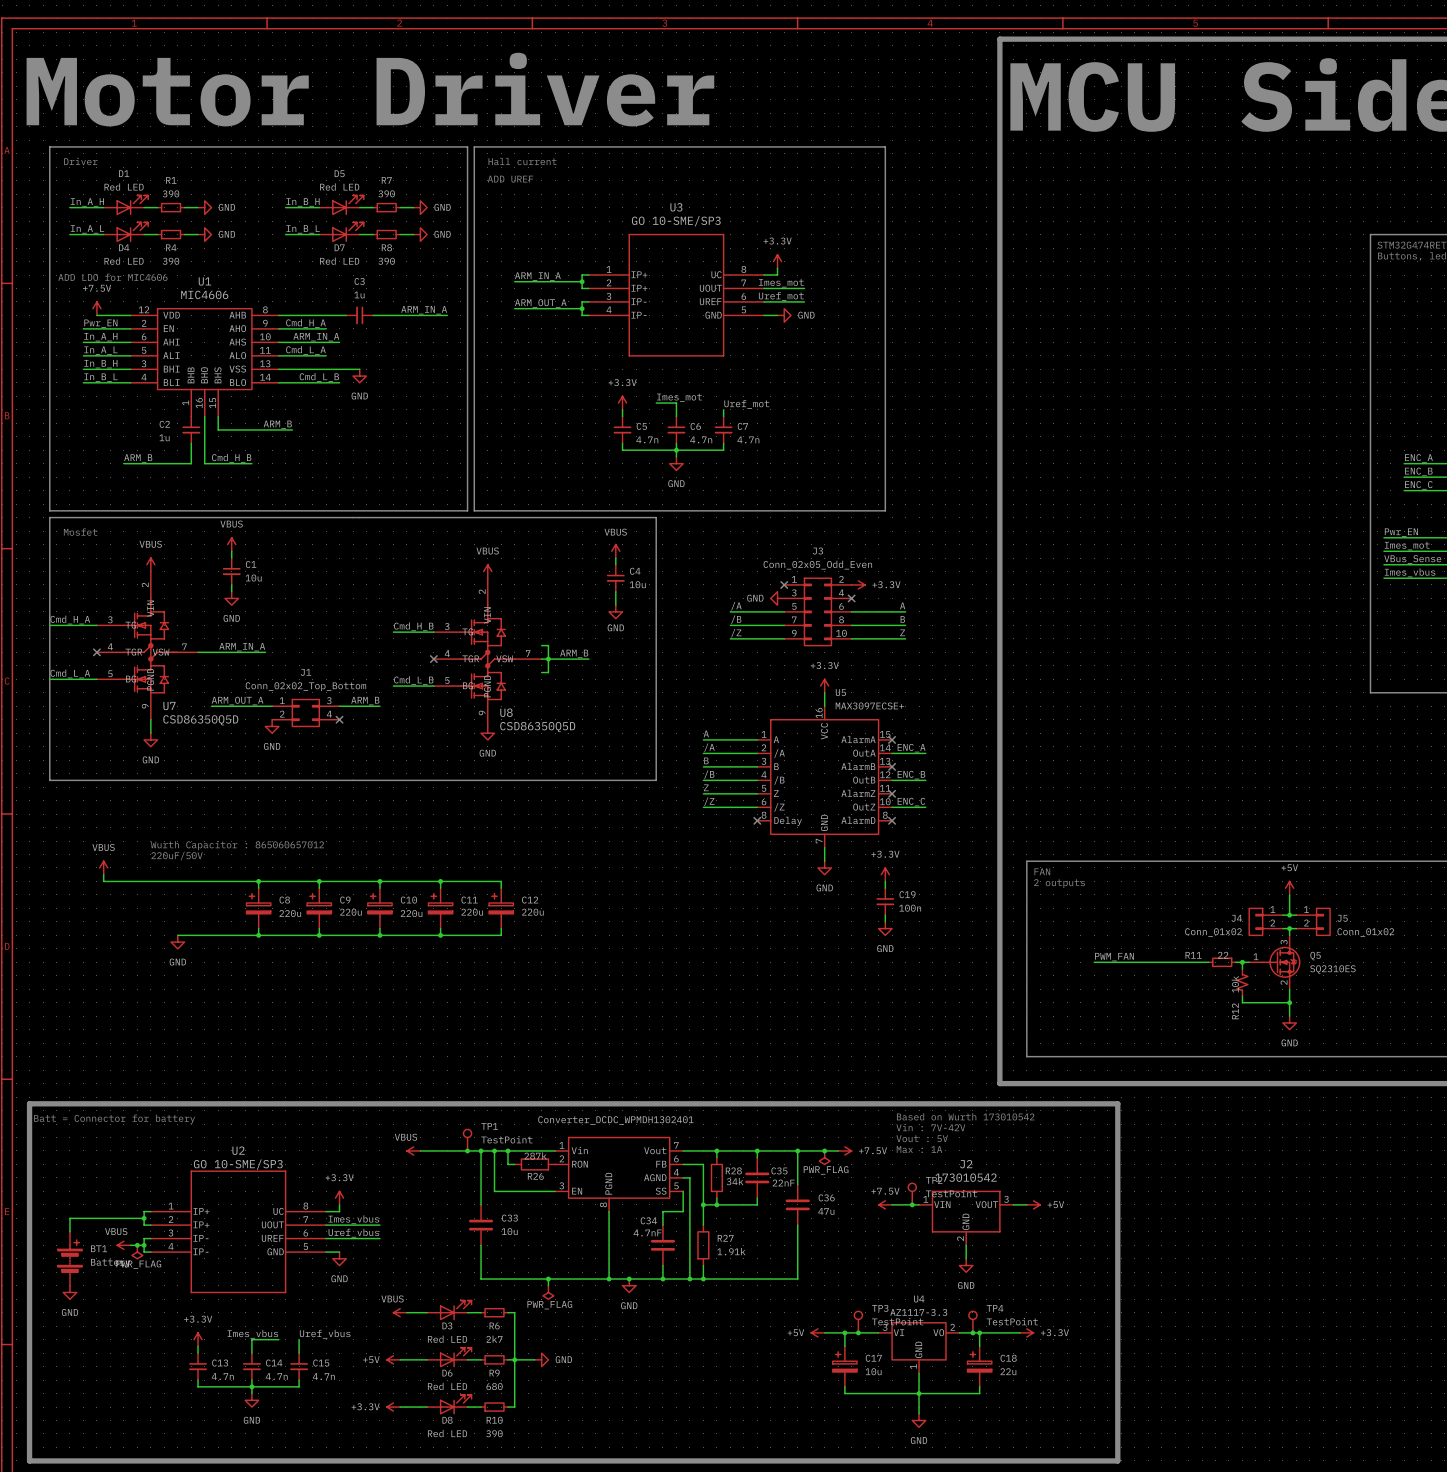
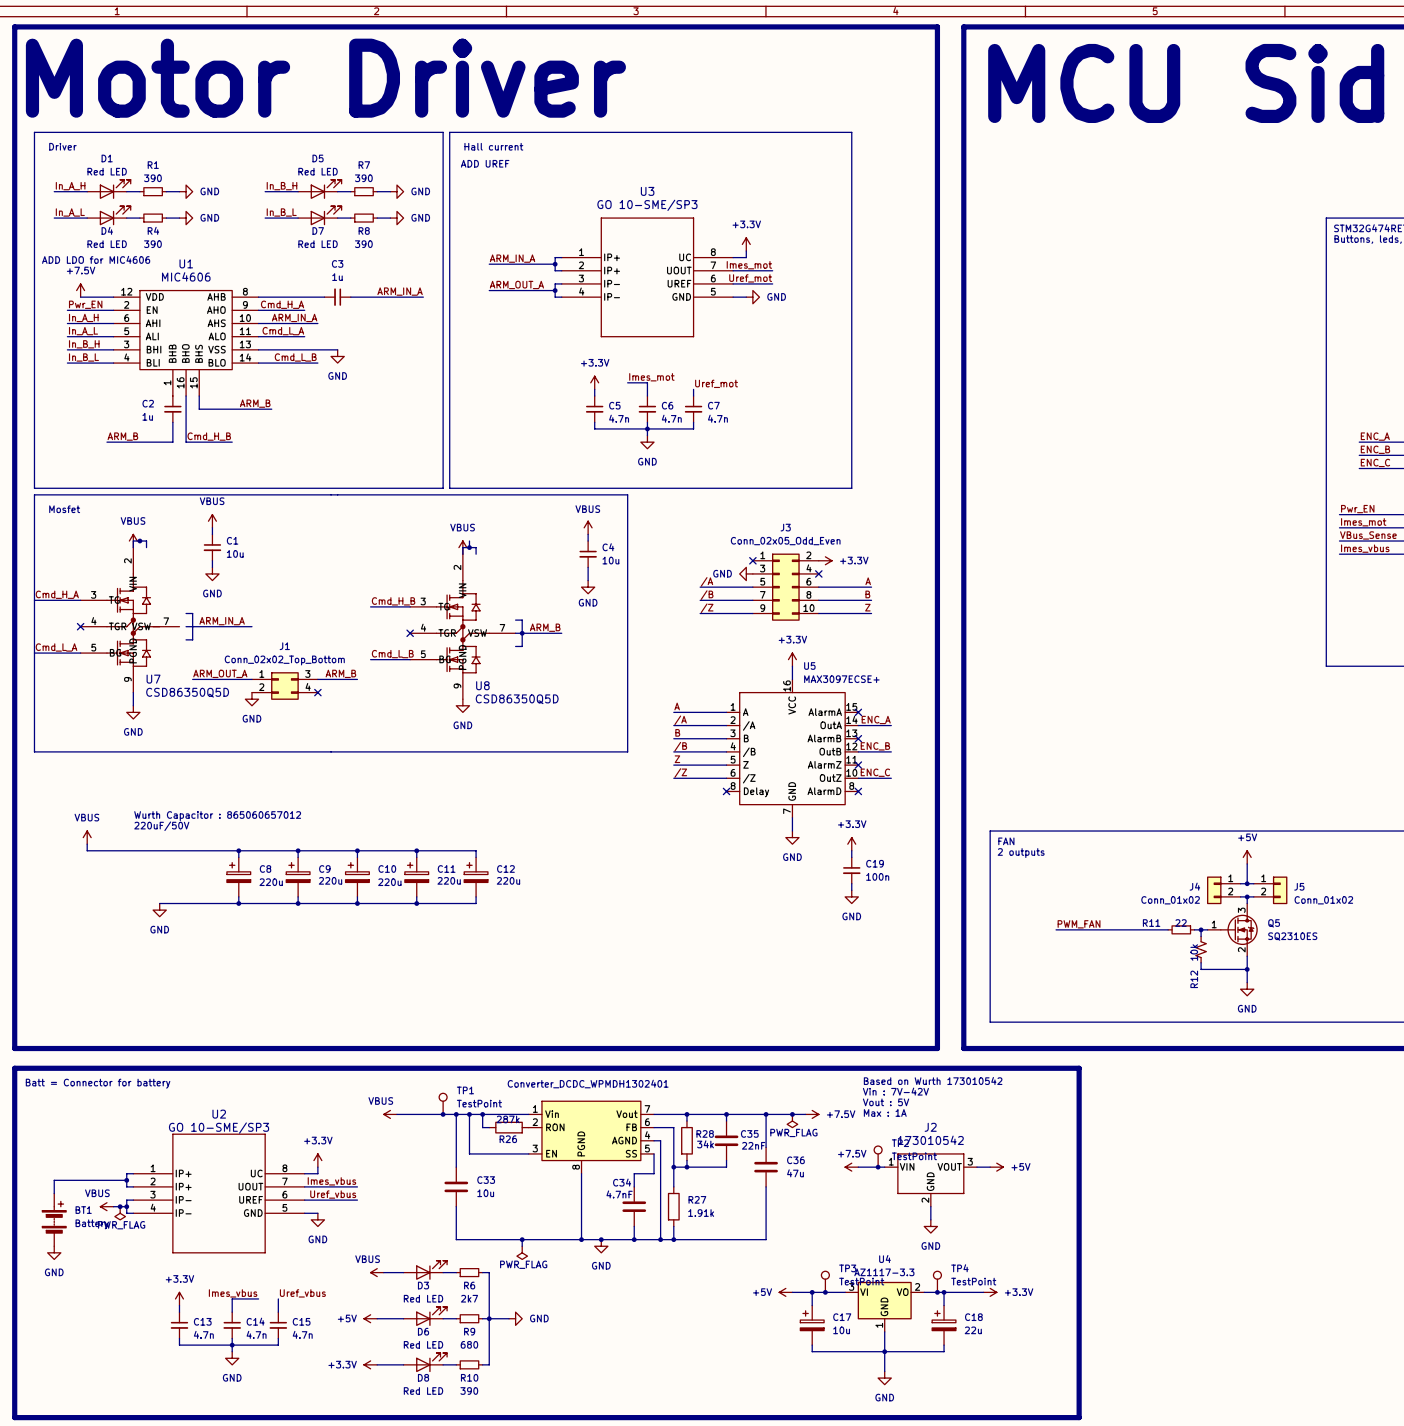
line: none -> (14, 26) (937, 26) (937, 1048) (14, 1048) (14, 26)
junction: none -> (139, 541)
wire: none -> (469, 541) (469, 547)
wire: none -> (133, 547) (133, 541) (146, 541) (146, 547)
junction: none -> (469, 547)
wire: none -> (462, 554) (462, 547) (476, 547) (476, 554)
wire: none -> (186, 613) (192, 613) (192, 639) (186, 639)
wire: (198, 652) (204, 652) -> (245, 626) (251, 626)

